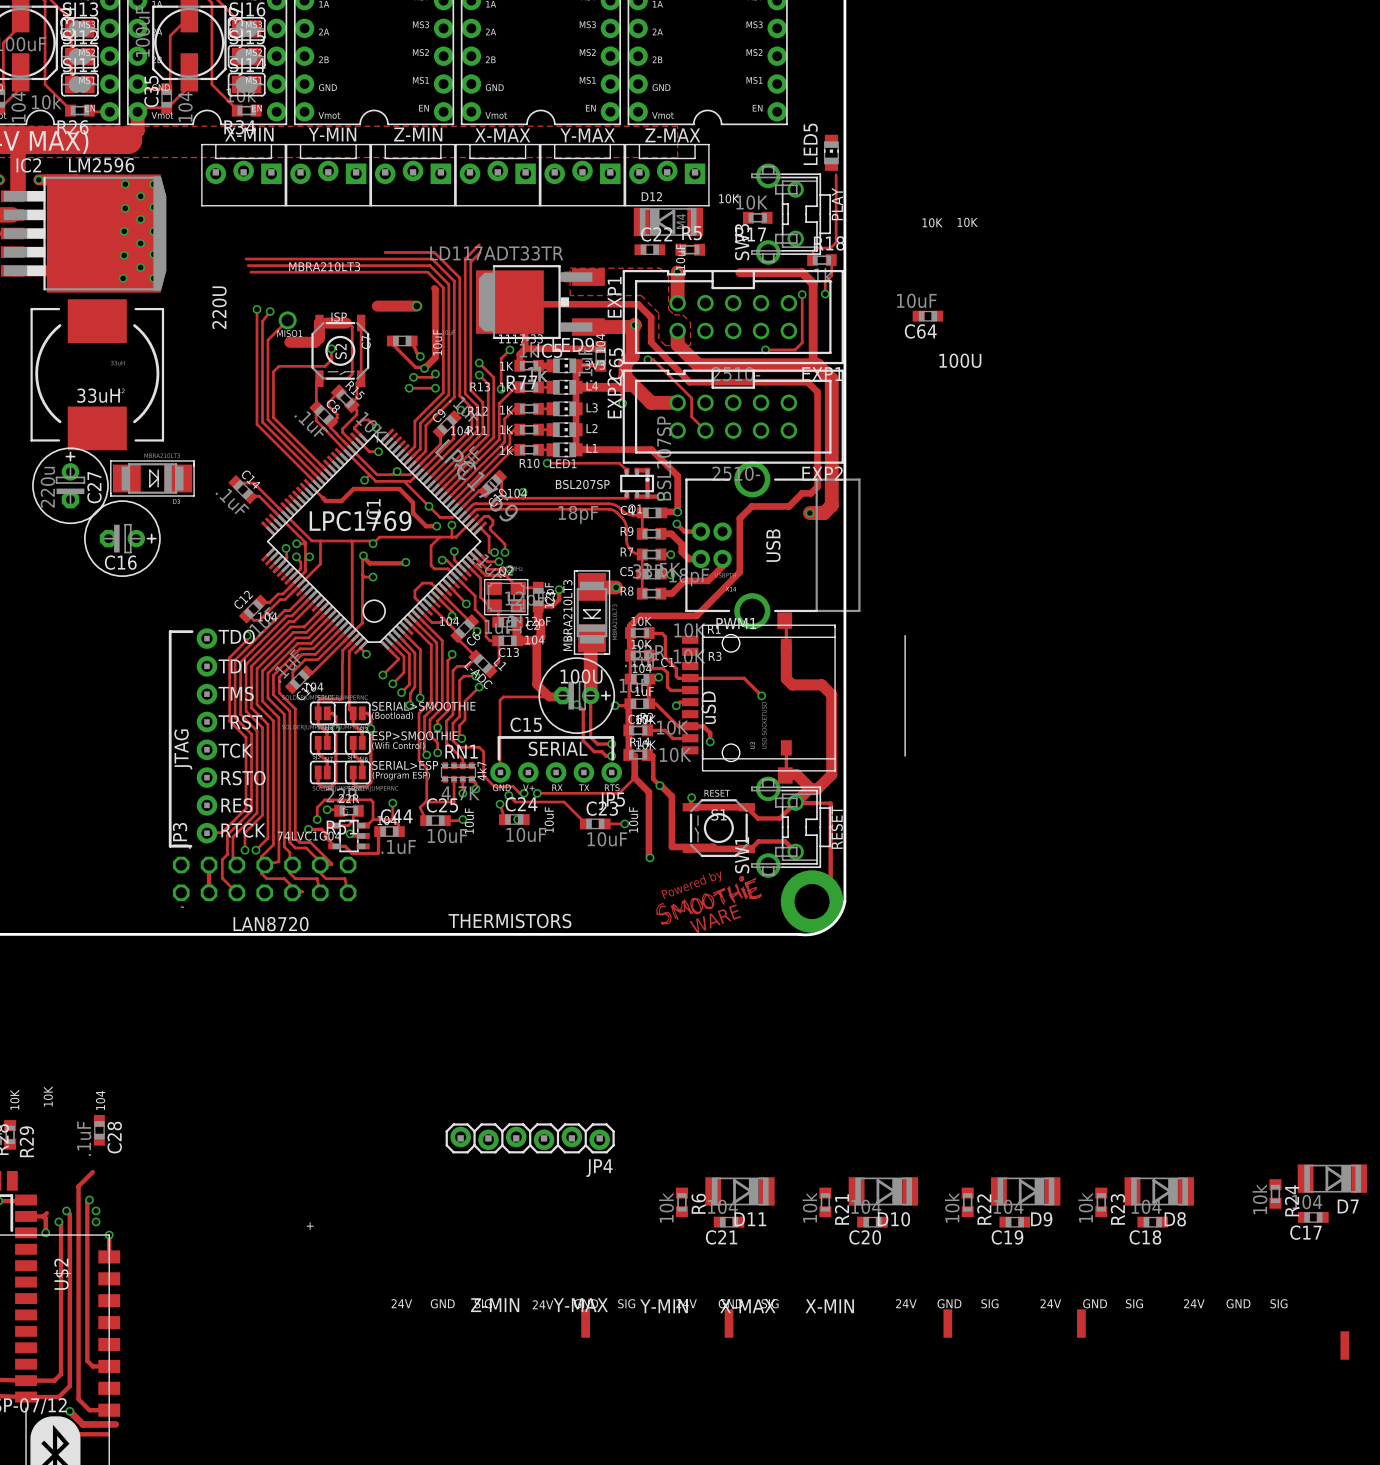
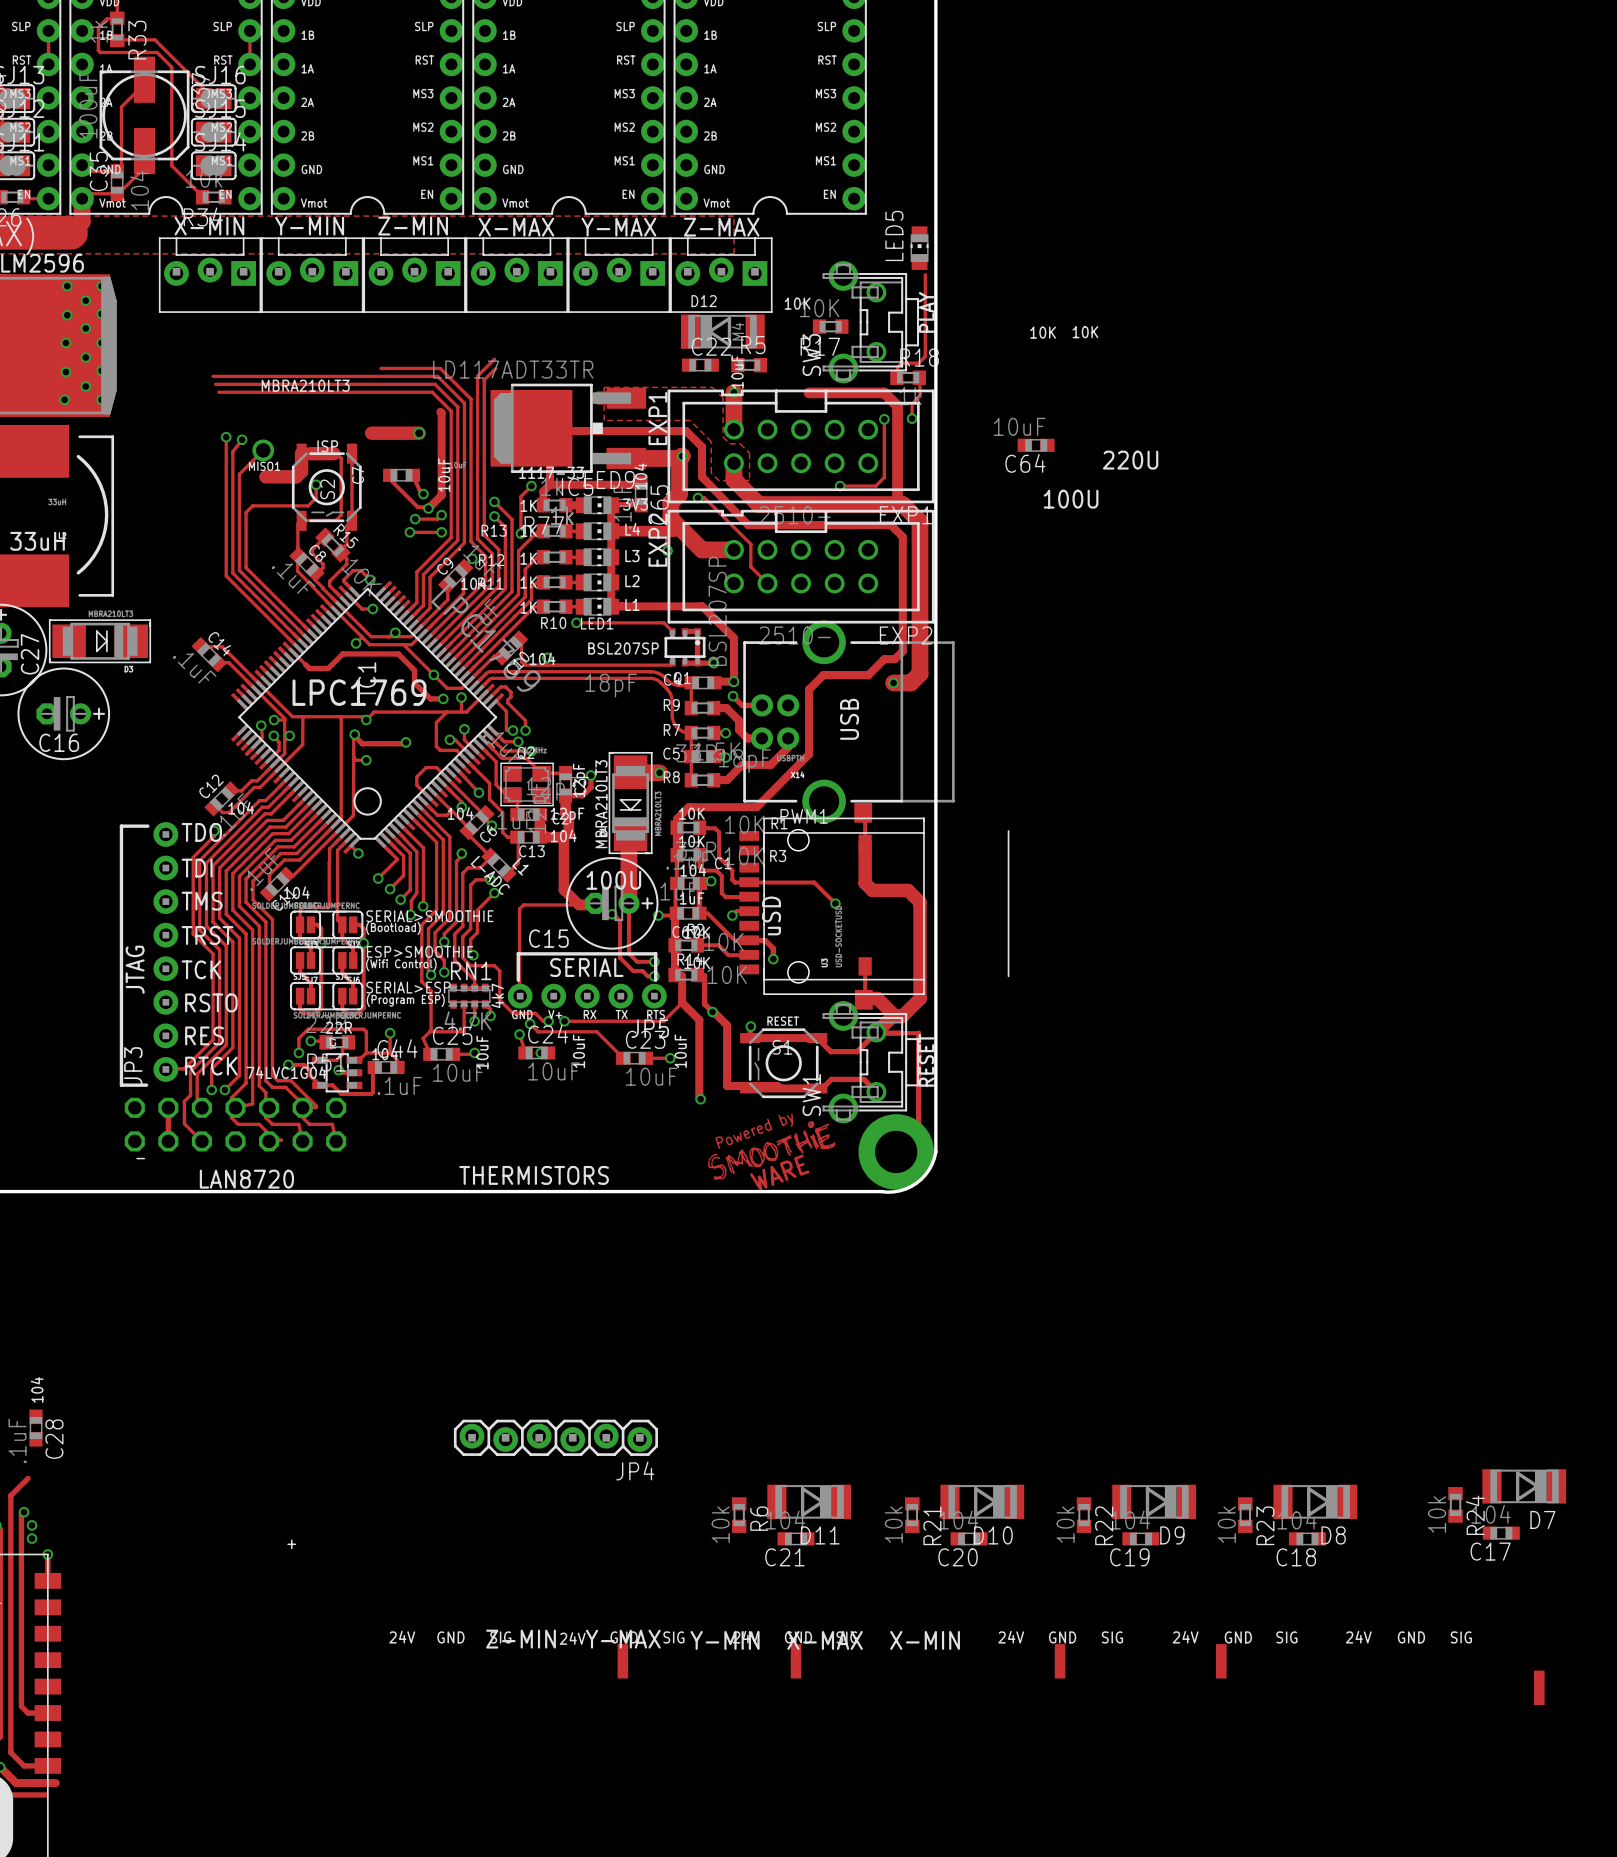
text: 220U (219, 307) -> none
text: none -> 220U (1130, 460)

